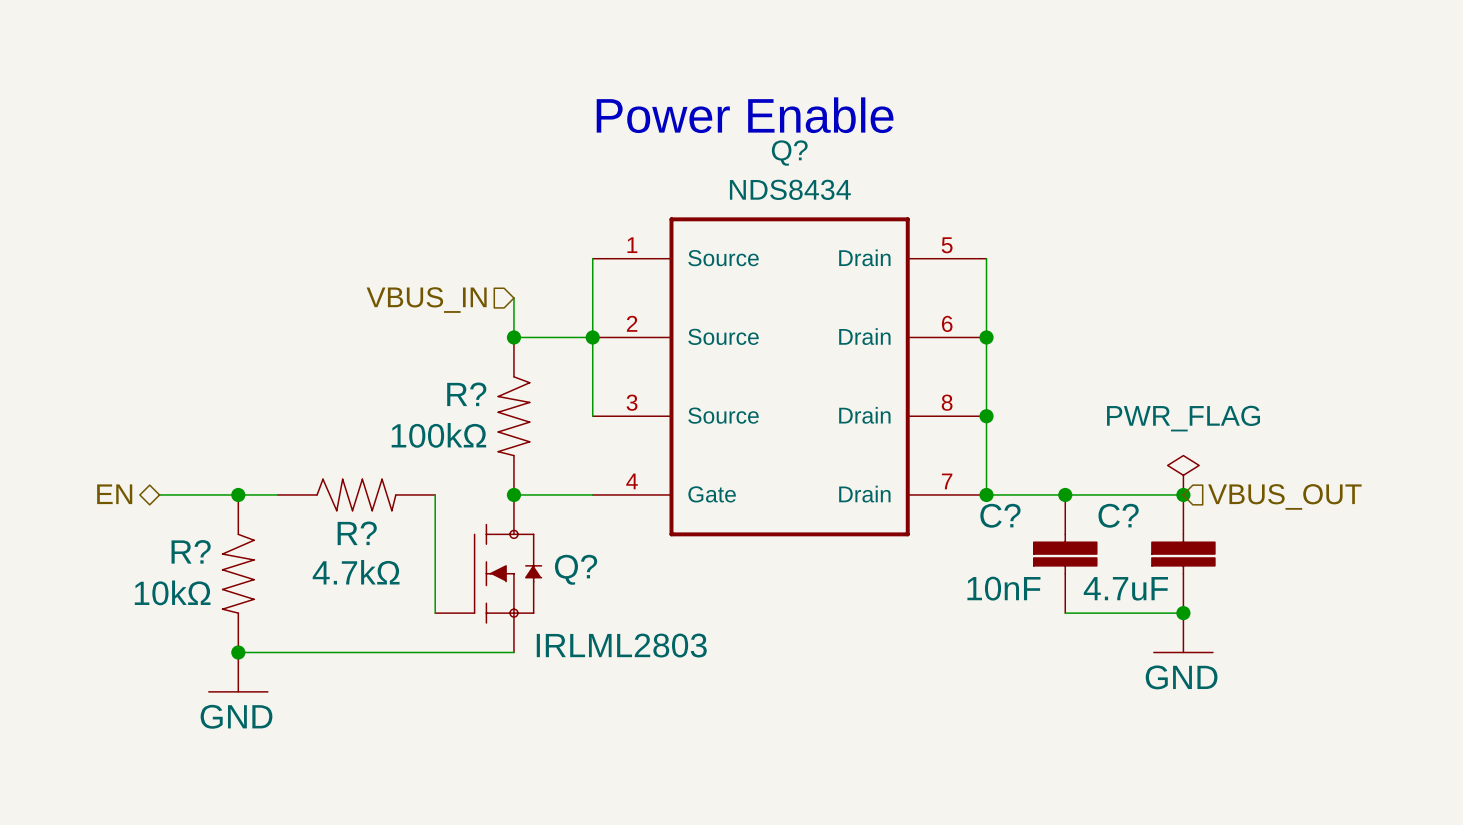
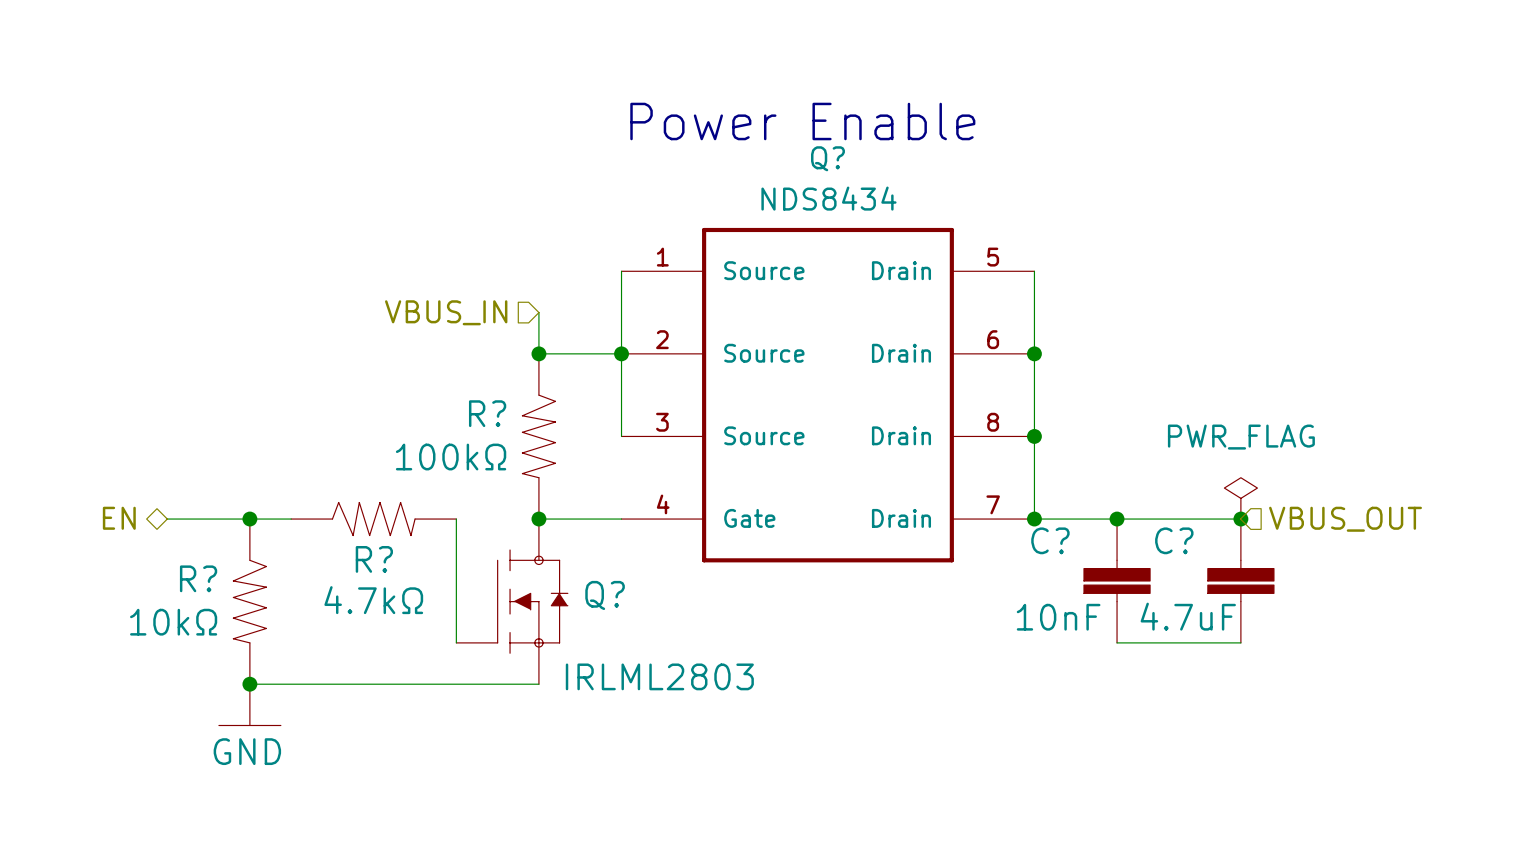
junction: (1183, 613) -> none
power symbol: GND (1183, 632) -> none

